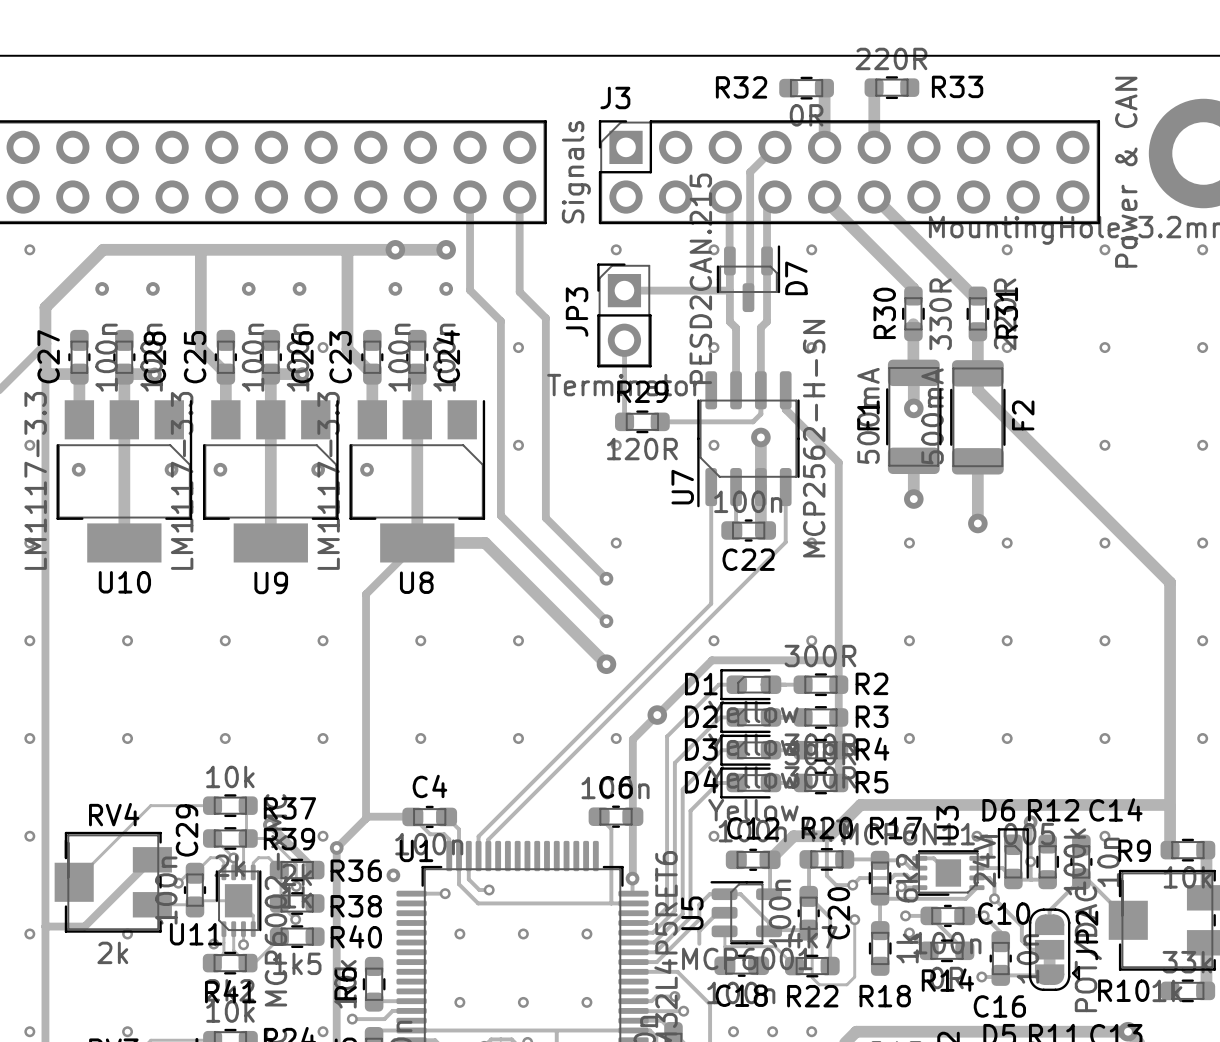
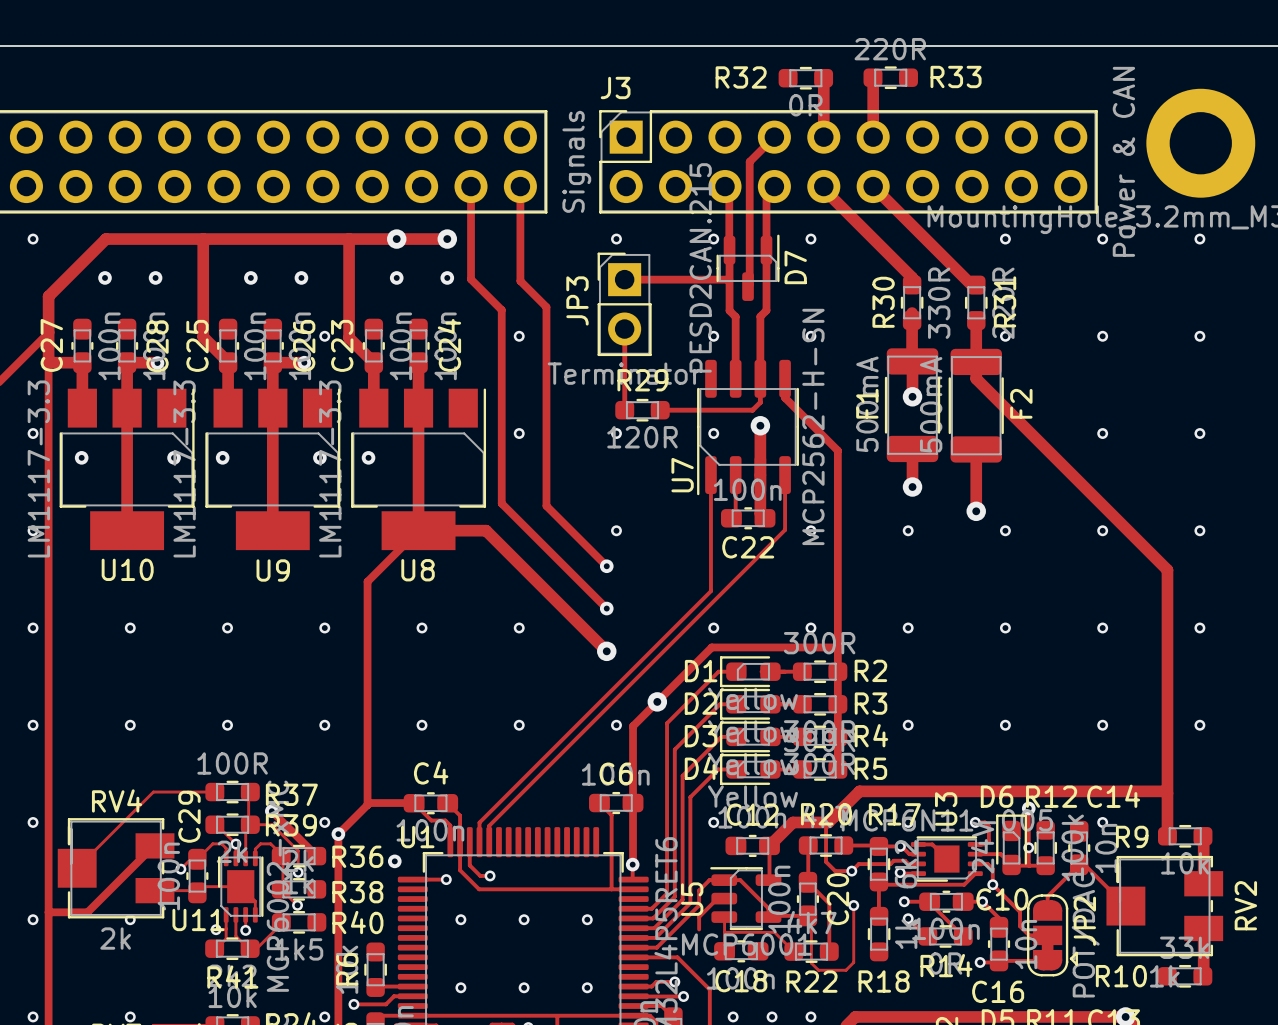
R37 value: 10k (230, 776) -> 100R (232, 763)

